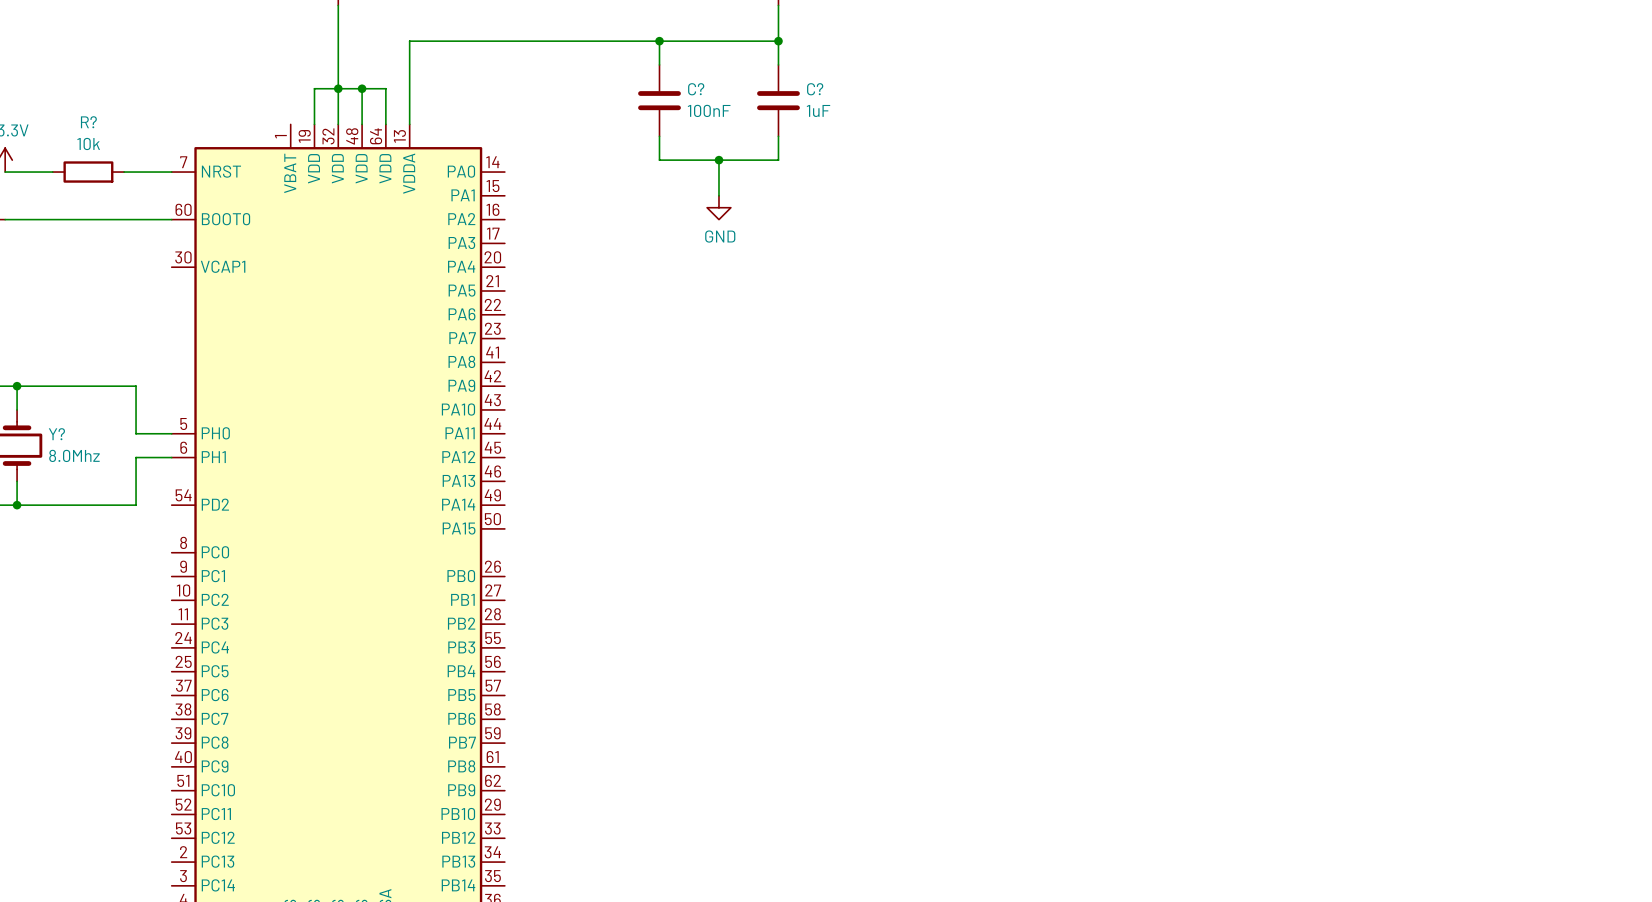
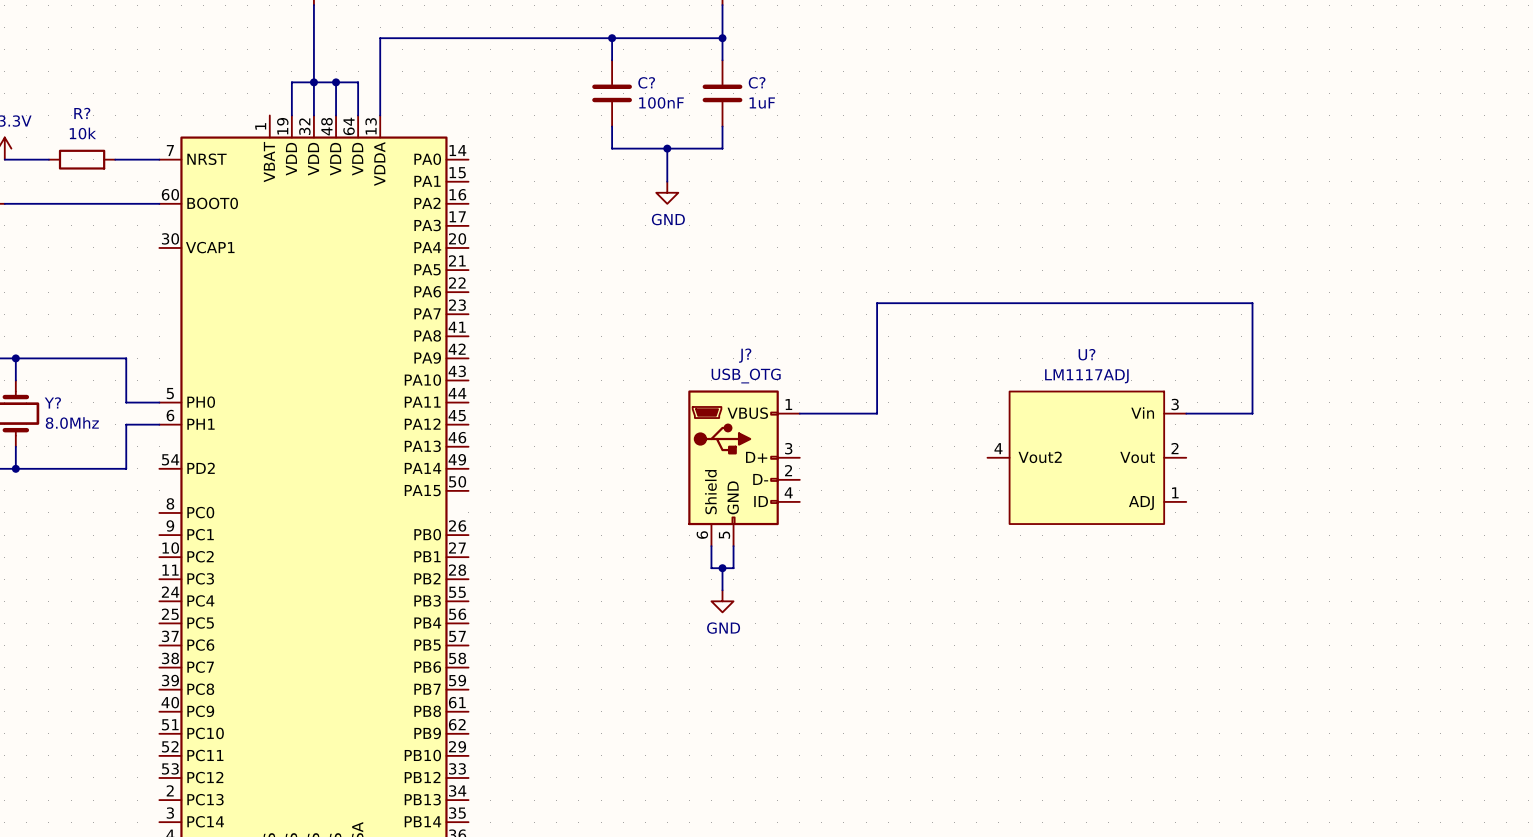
wire: none -> (799, 413) (877, 413) (877, 303) (1252, 303) (1252, 413) (1186, 413)
U?: none -> LM1117ADJ (1086, 457)
J?: none -> USB_OTG (744, 468)
wire: none -> (711, 546) (711, 568) (733, 568) (733, 546)
wire: none -> (722, 568) (722, 590)
junction: none -> (722, 568)
power symbol: none -> GND (722, 601)

